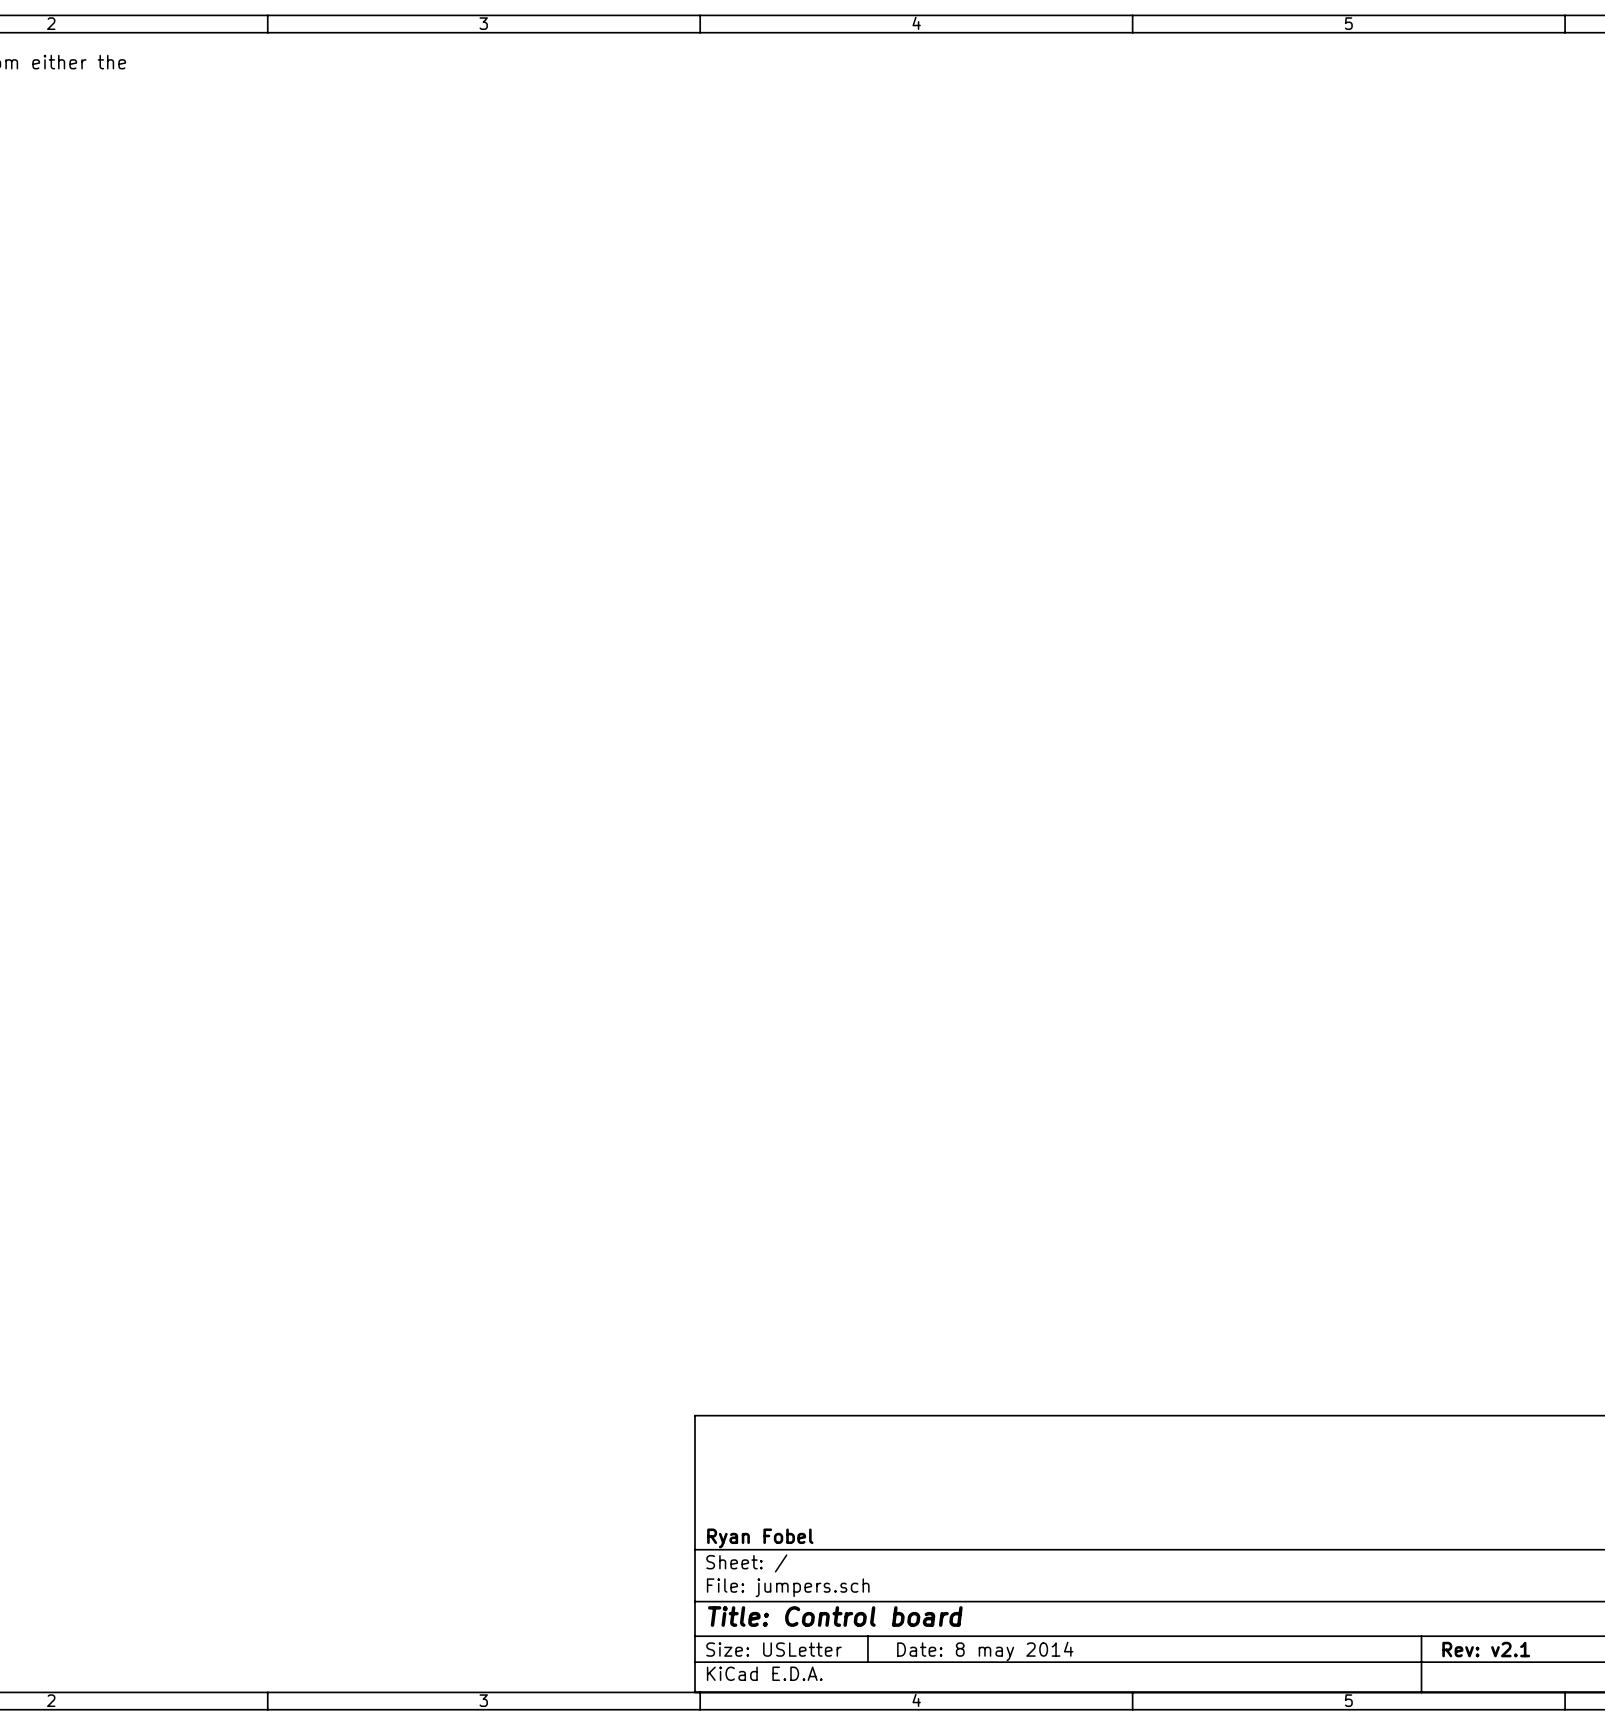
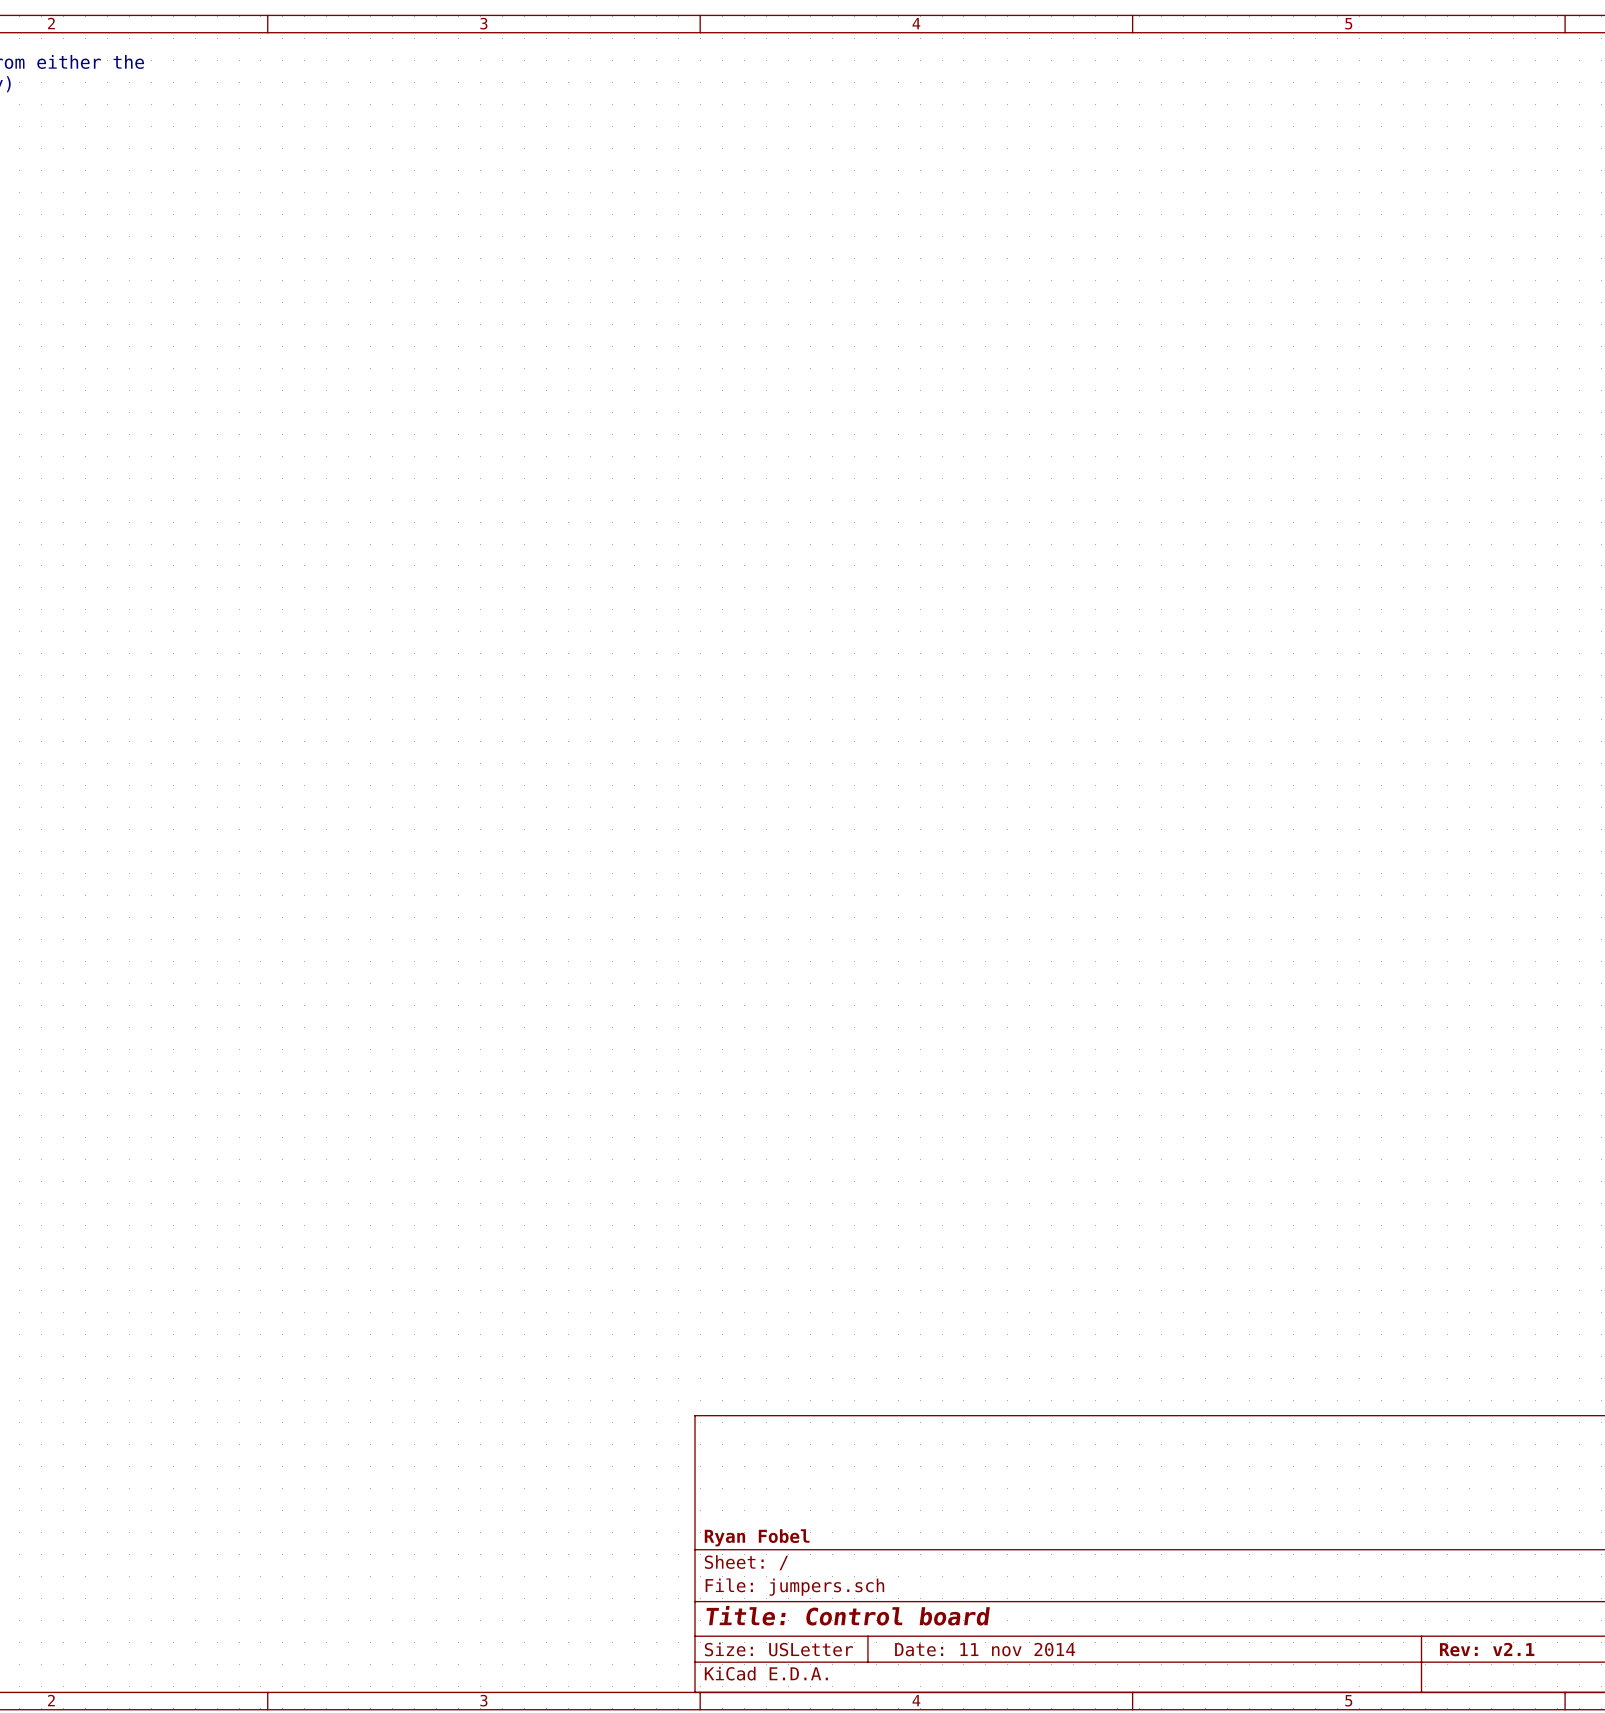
title block: Date: 8 may 2014 (985, 1651) -> Date: 11 nov 2014 (985, 1649)

